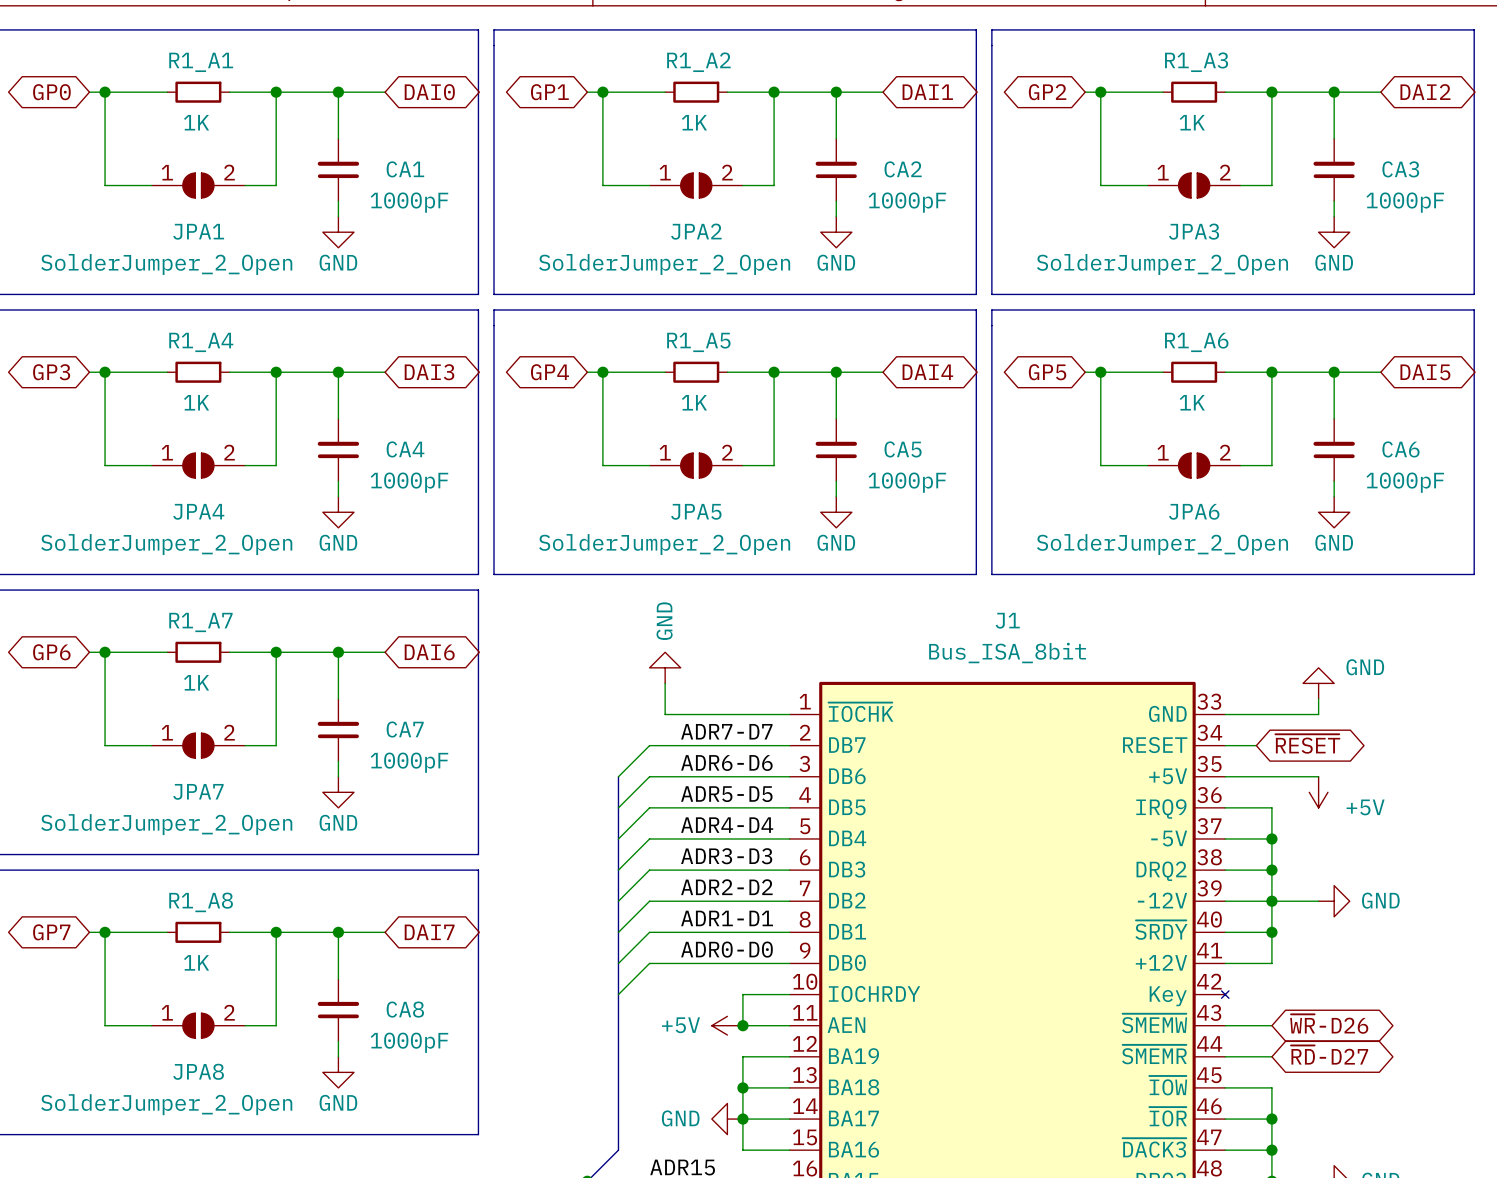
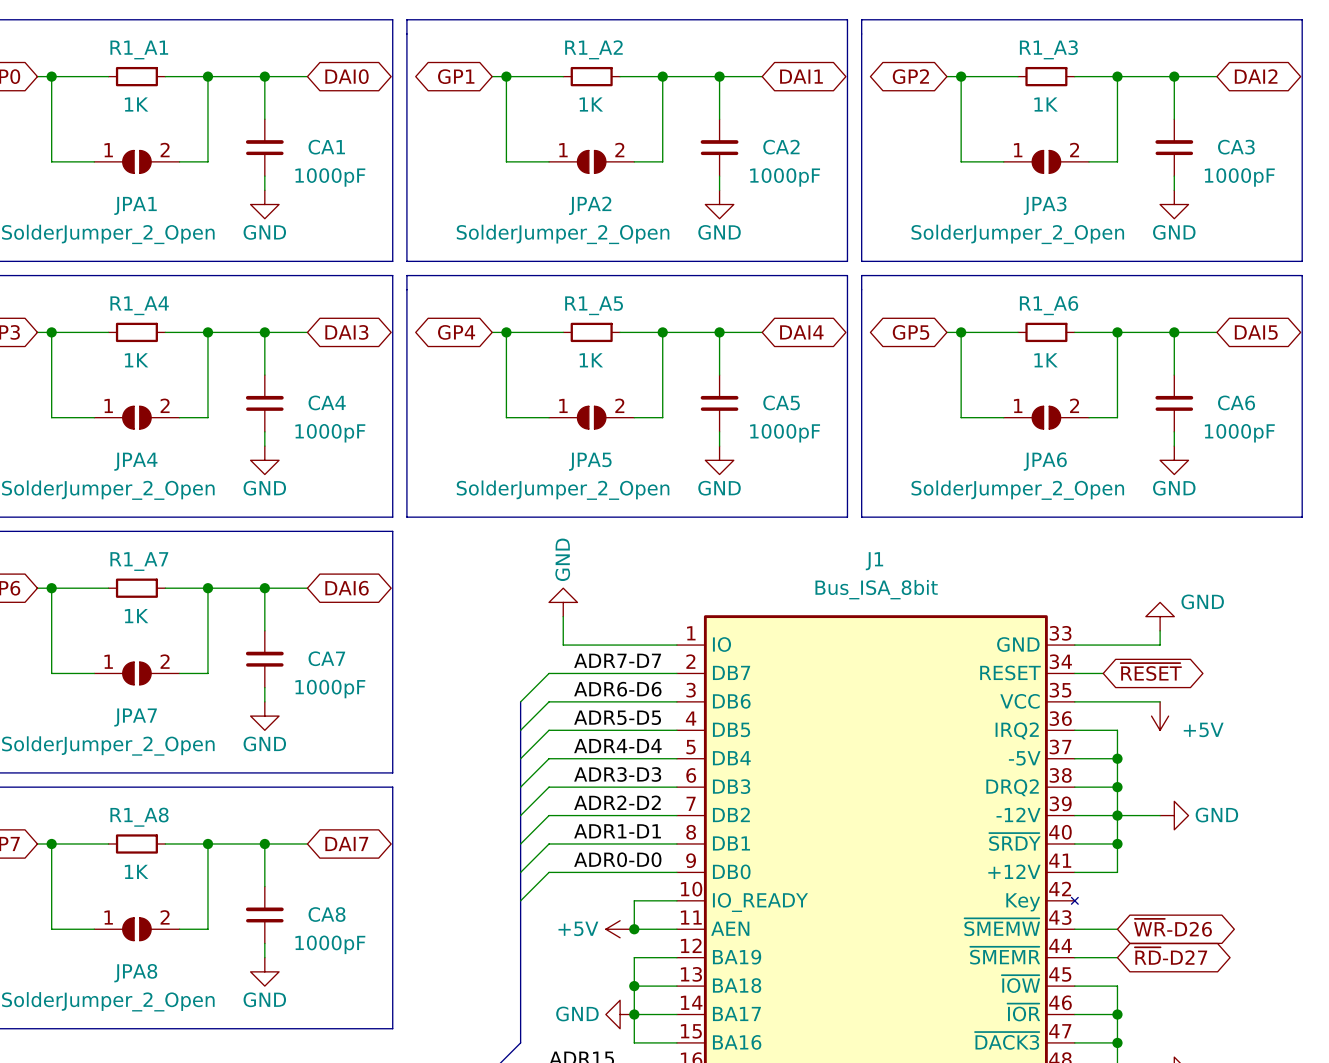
J1 pin name: ~{IOCHK} (860, 712) -> IO (721, 644)
J1 pin name: +5V (1168, 776) -> VCC (1019, 701)
J1 pin name: IRQ9 (1161, 808) -> IRQ2 (1017, 730)
J1 pin name: IOCHRDY (874, 993) -> IO_READY (760, 902)

